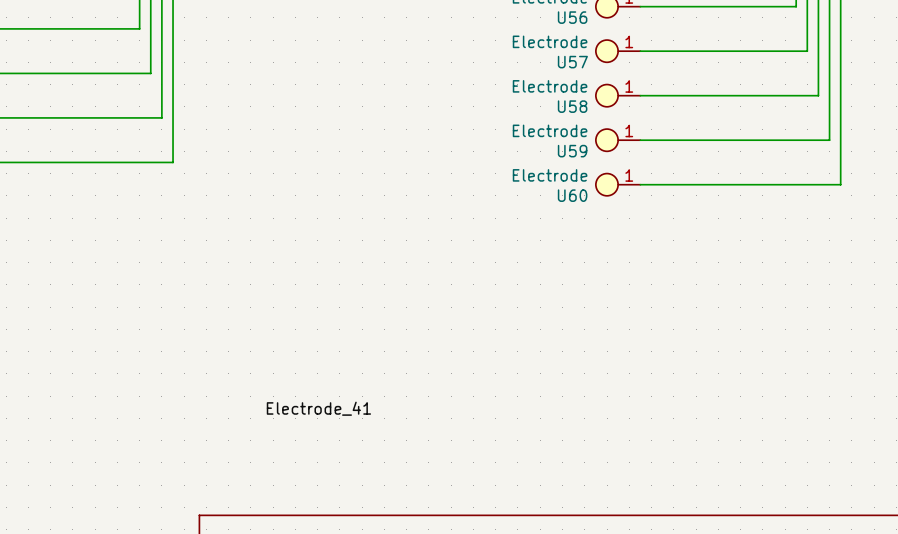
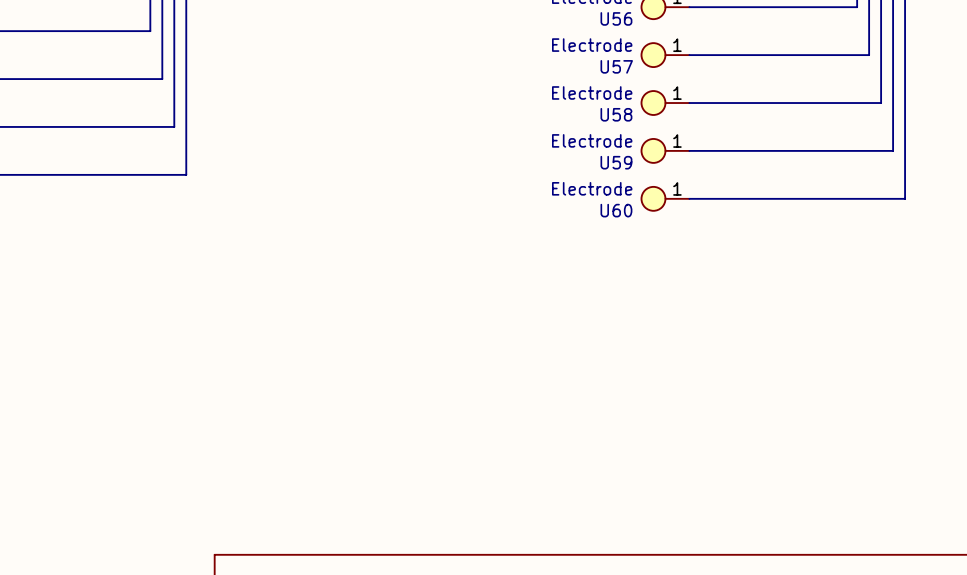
label: Electrode_41 (318, 408) -> none

